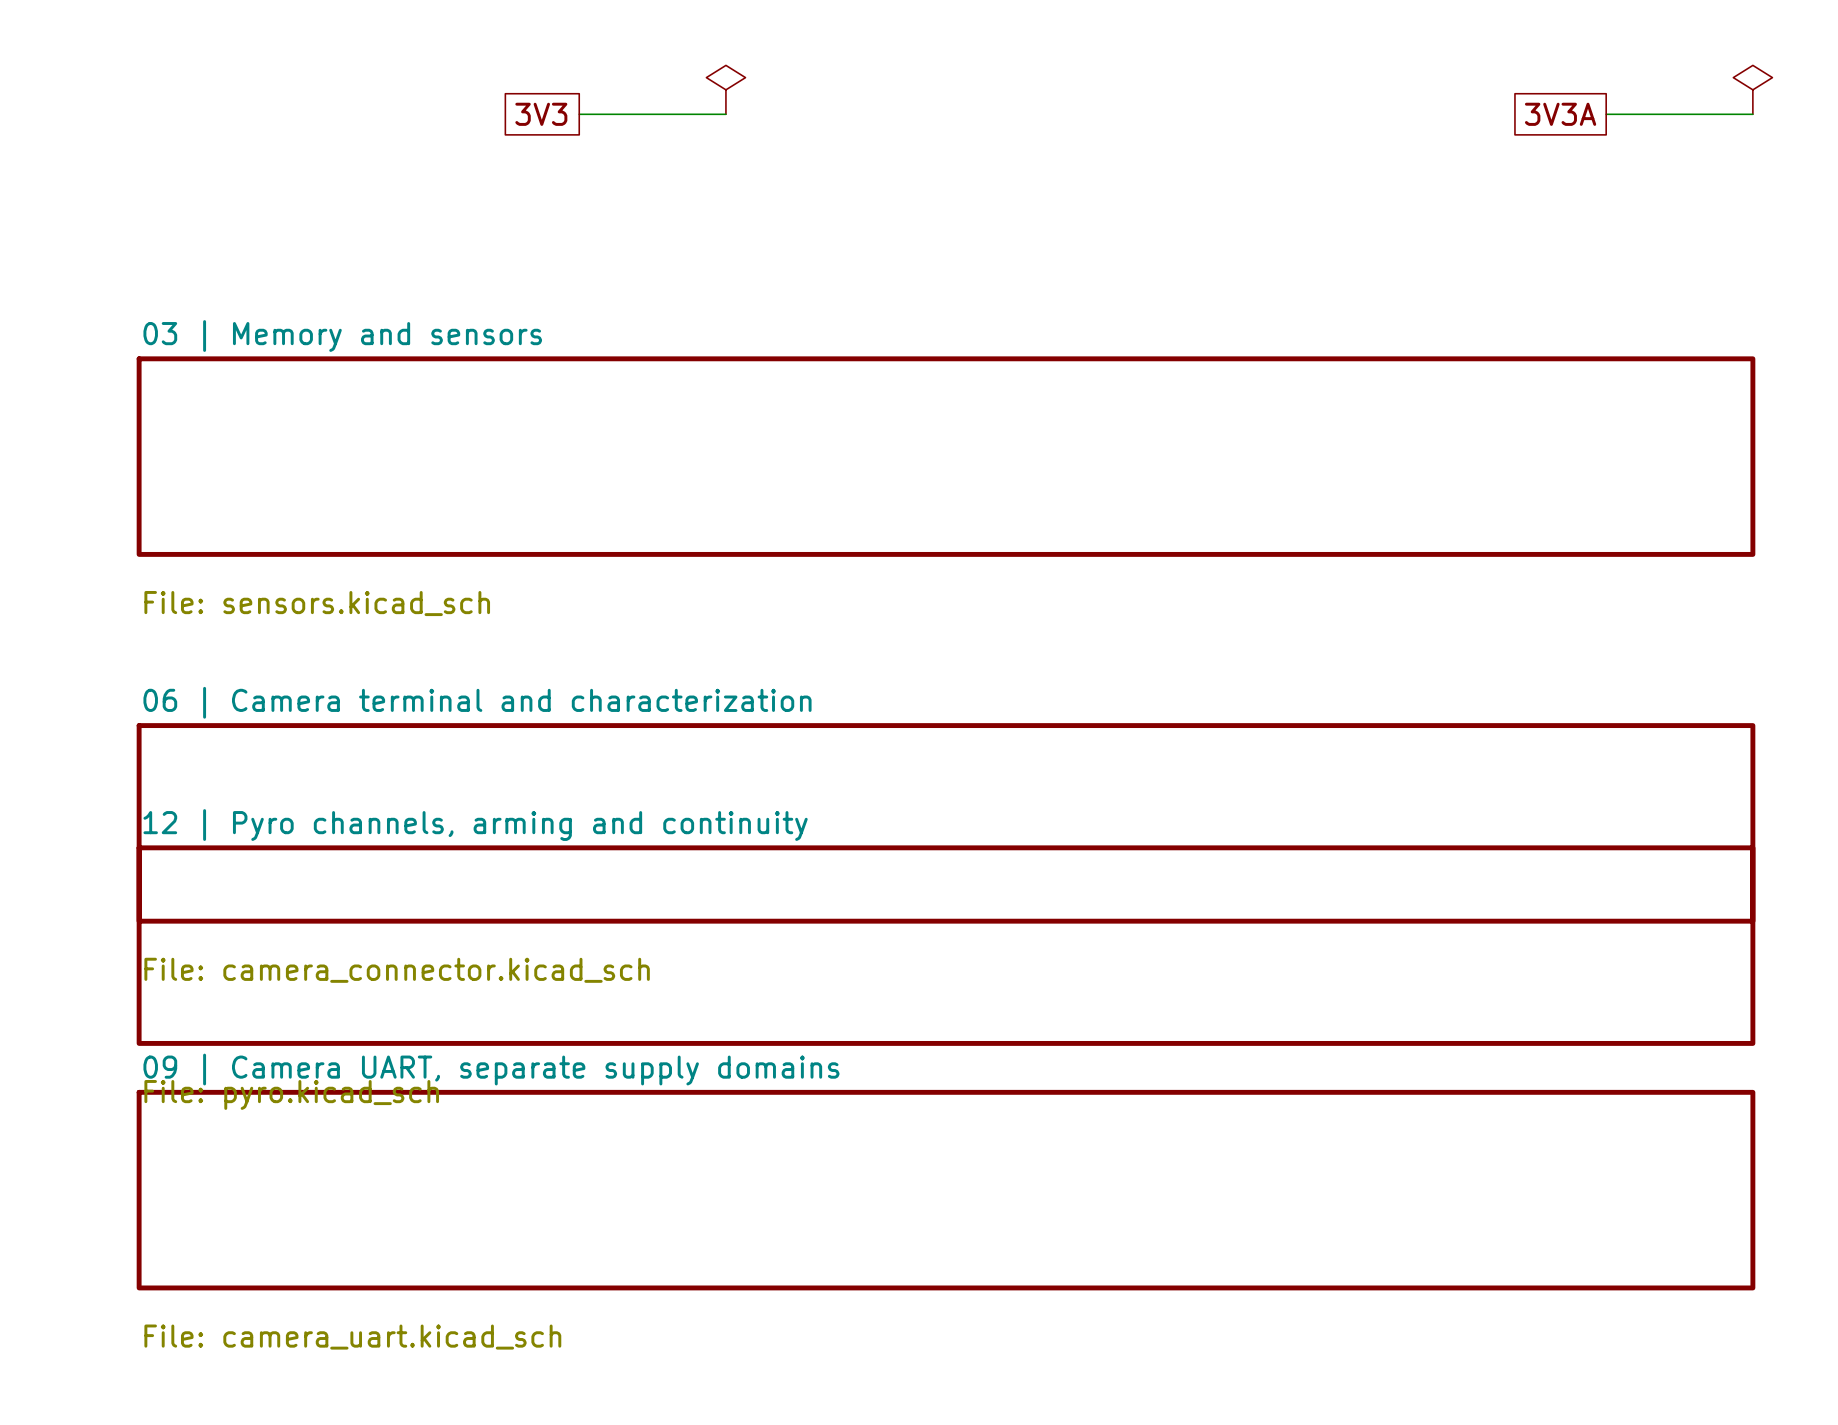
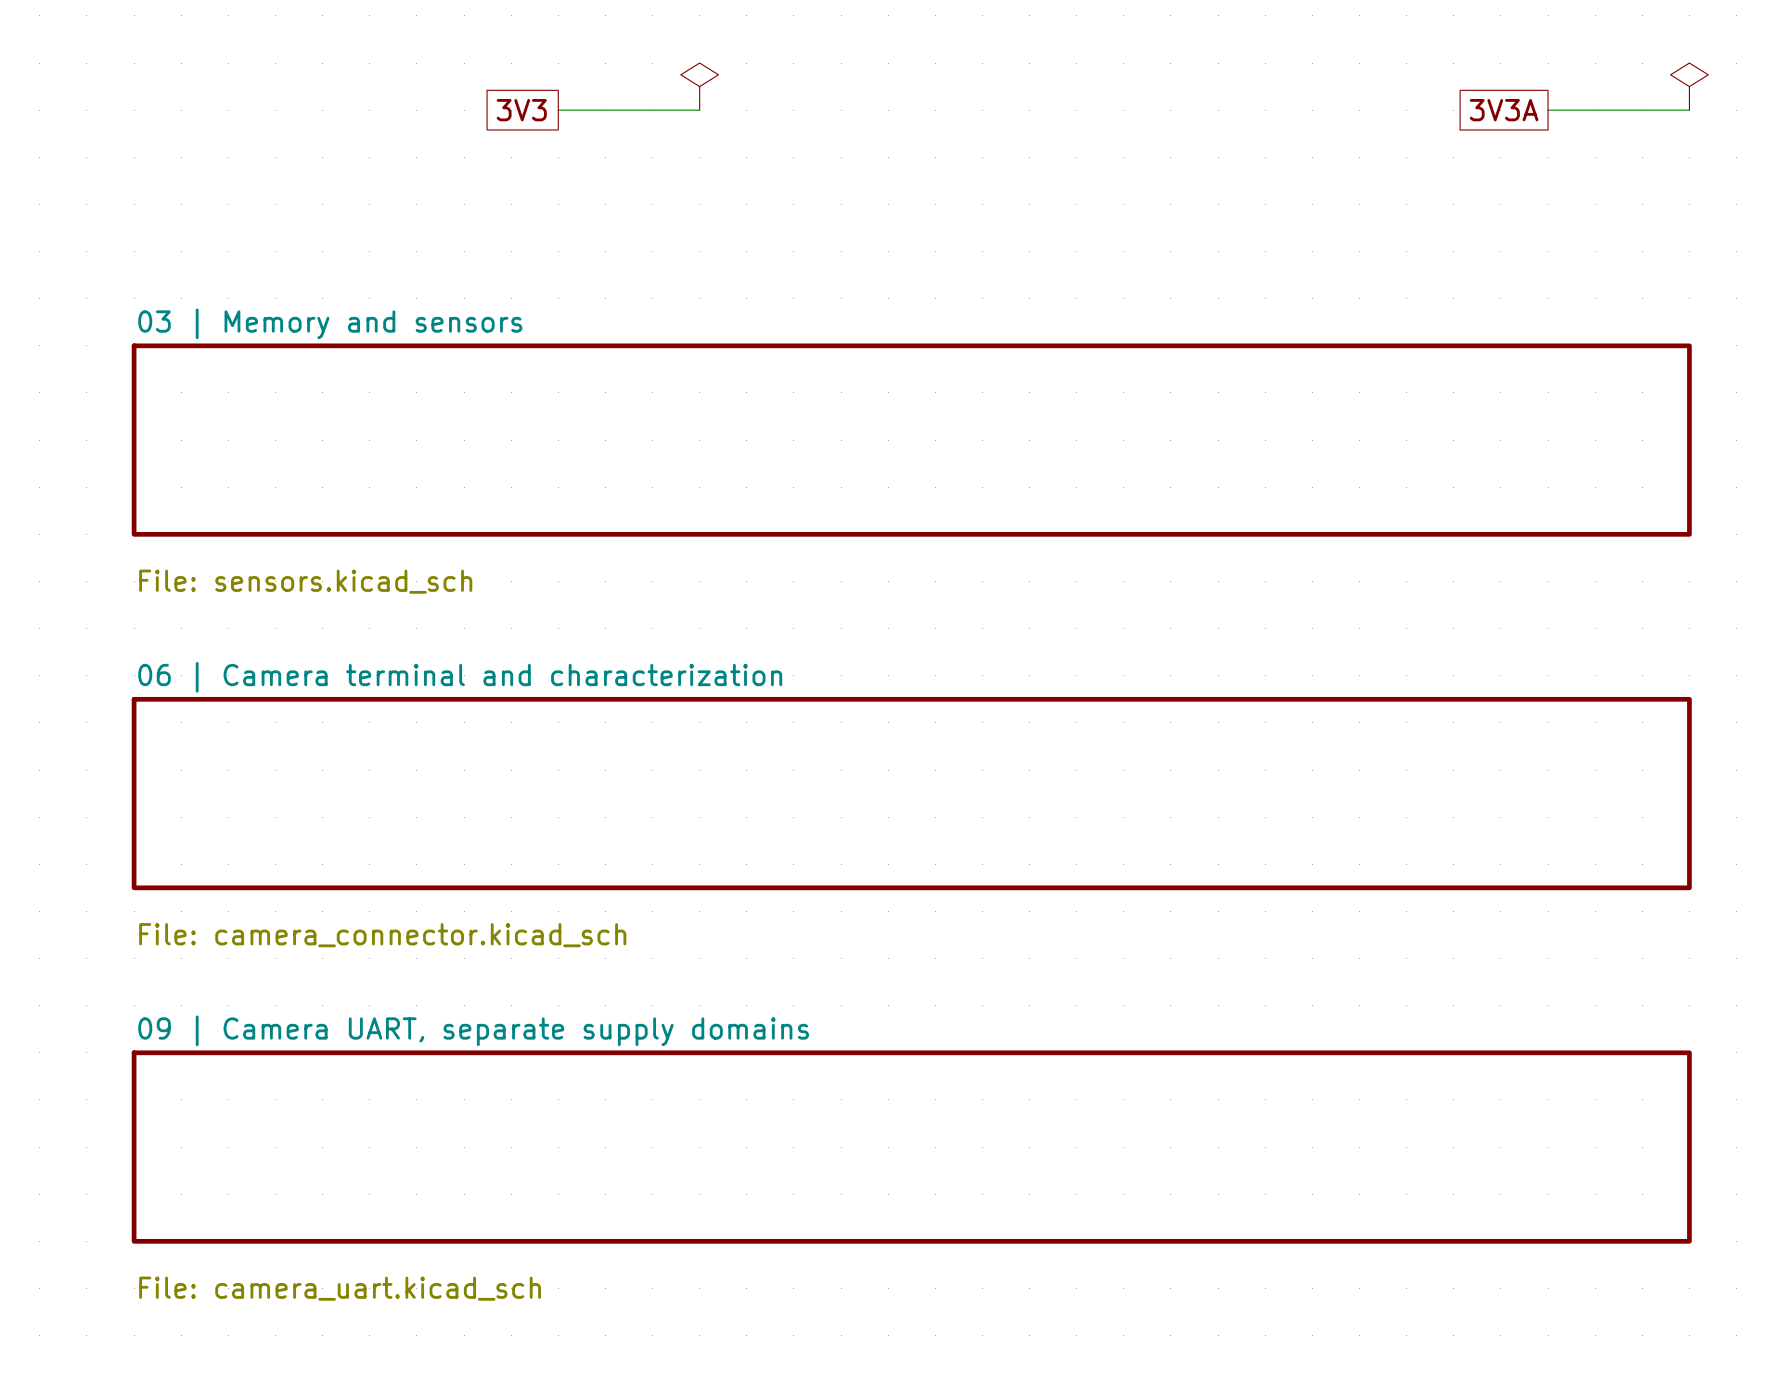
sheet 12 | Pyro channels, arming and continuity: File: pyro.kicad_sch (946, 945) -> none

